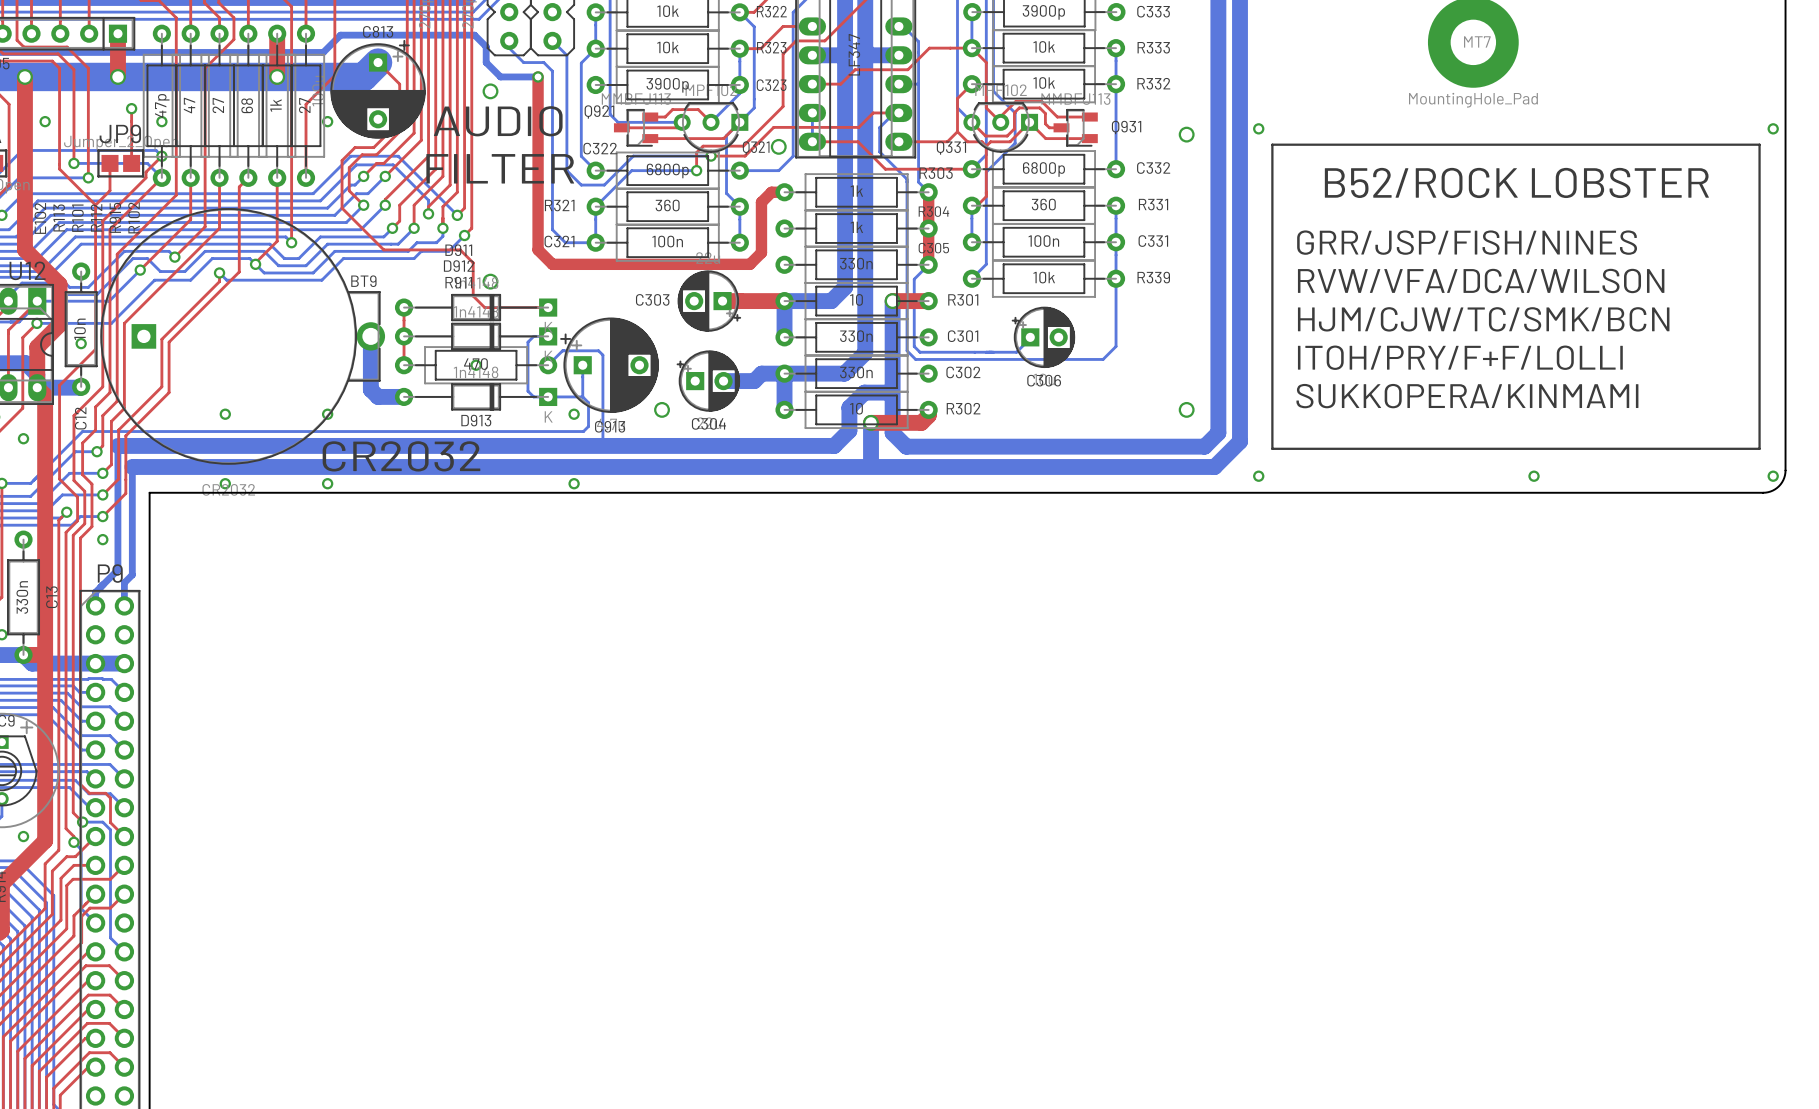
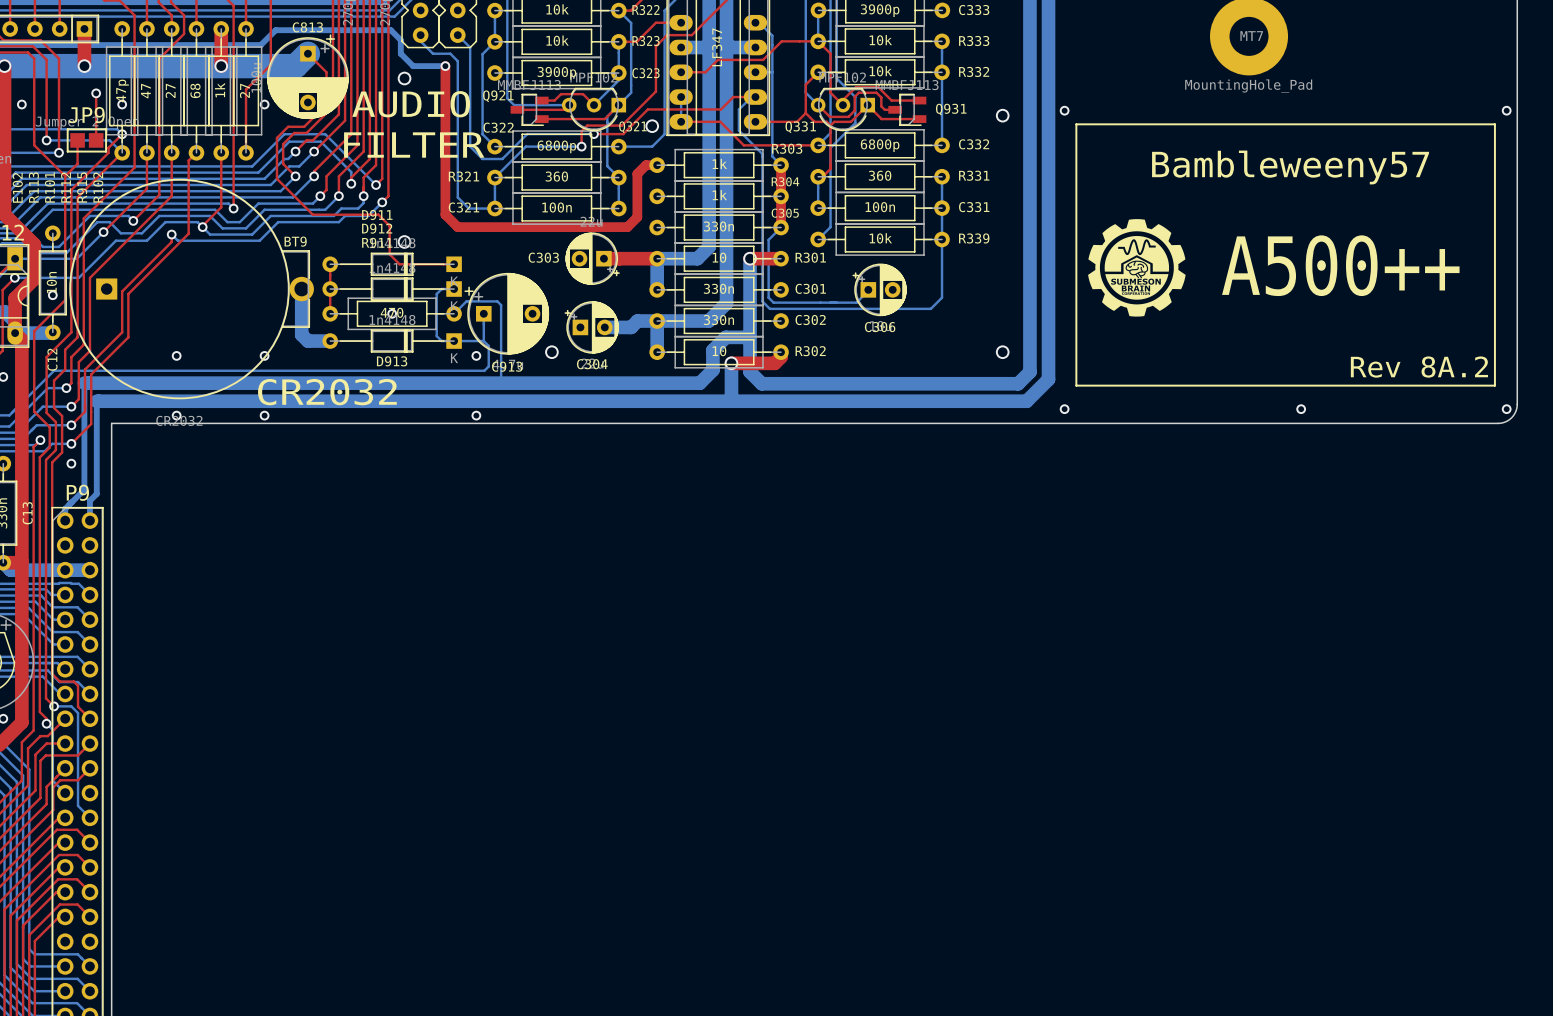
text: B52/ROCK LOBSTER (1516, 182) -> Bambleweeny57 (1290, 167)
text: GRR/JSP/FISH/NINES (1467, 242) -> none
drawing: none -> [1088, 219, 1186, 317]
text: RVW/VFA/DCA/WILSON (1481, 281) -> none
text: none -> A500++ (1340, 265)
text: HJM/CJW/TC/SMK/BCN (1483, 319) -> none
text: ITOH/PRY/F+F/LOLLI (1460, 357) -> none
text: SUKKOPERA/KINMAMI (1467, 396) -> none
text: none -> Rev 8A.2 (1419, 367)

